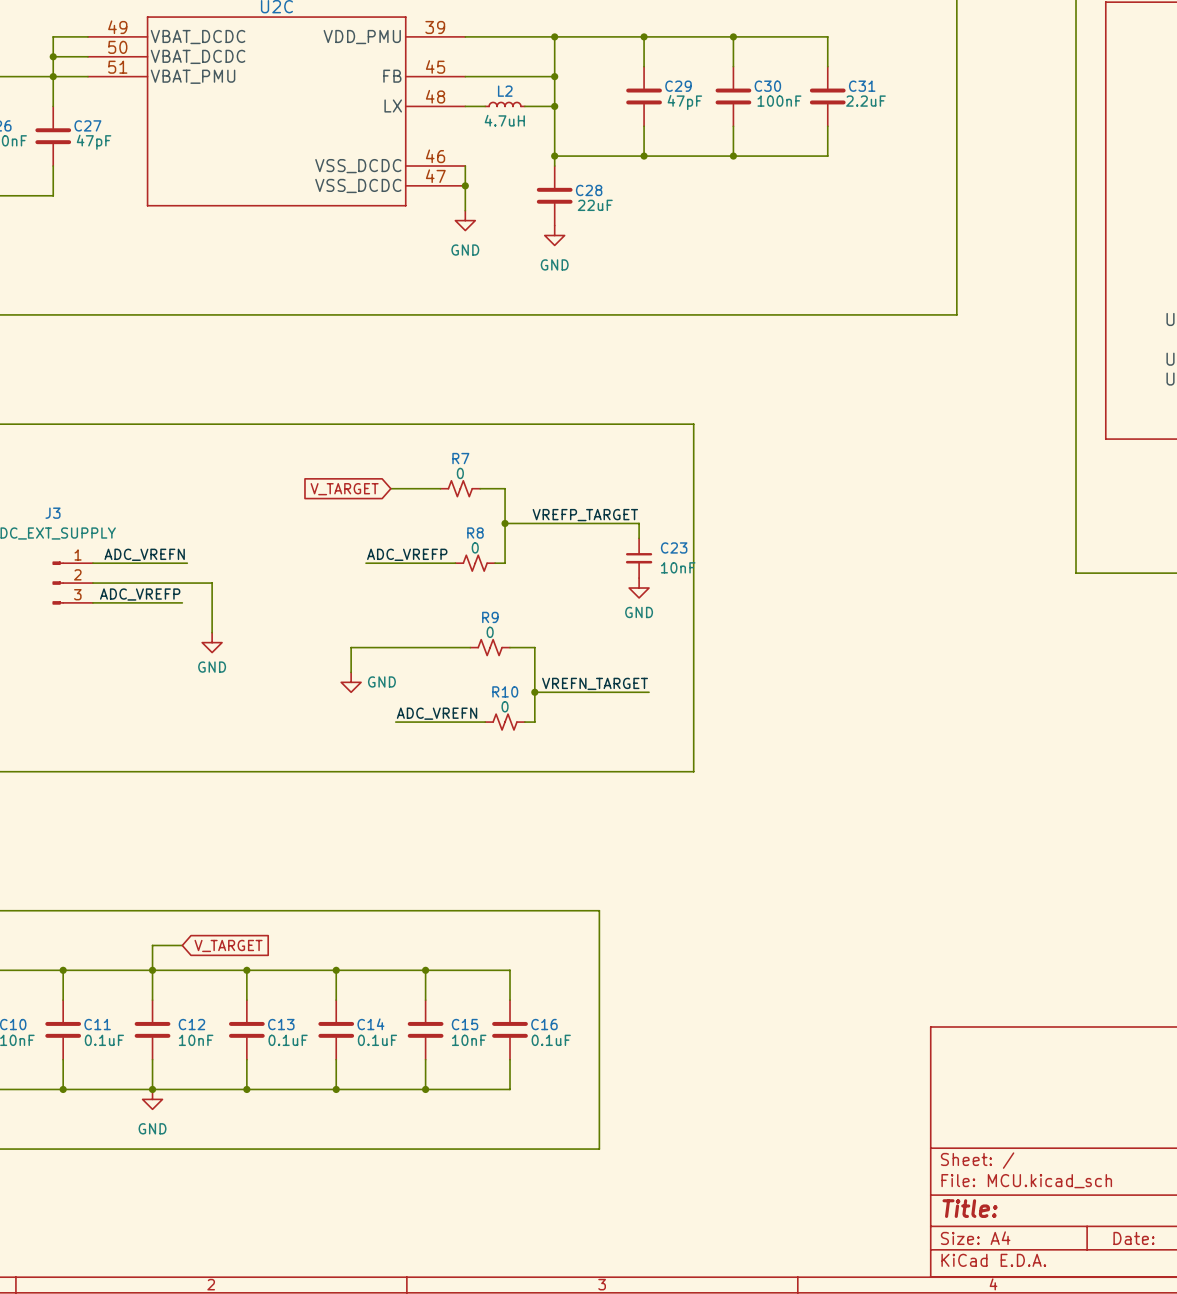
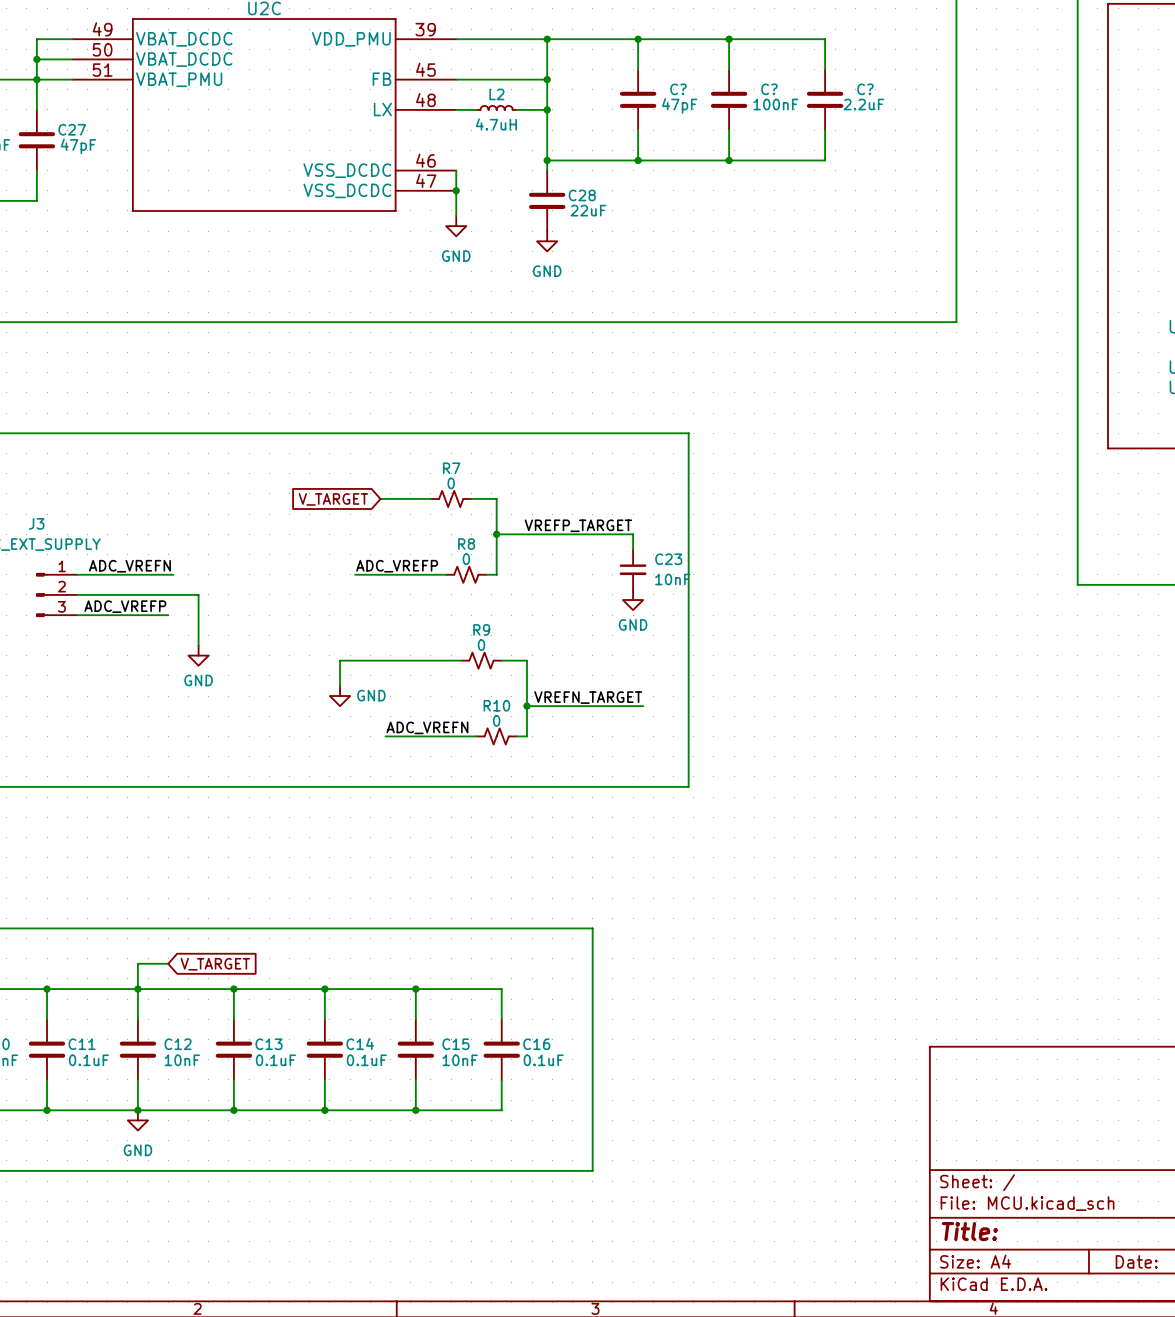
C29 name: C29 (678, 86) -> C? (678, 89)
C30 name: C30 (767, 86) -> C? (769, 89)
C31 name: C31 (862, 86) -> C? (865, 89)

